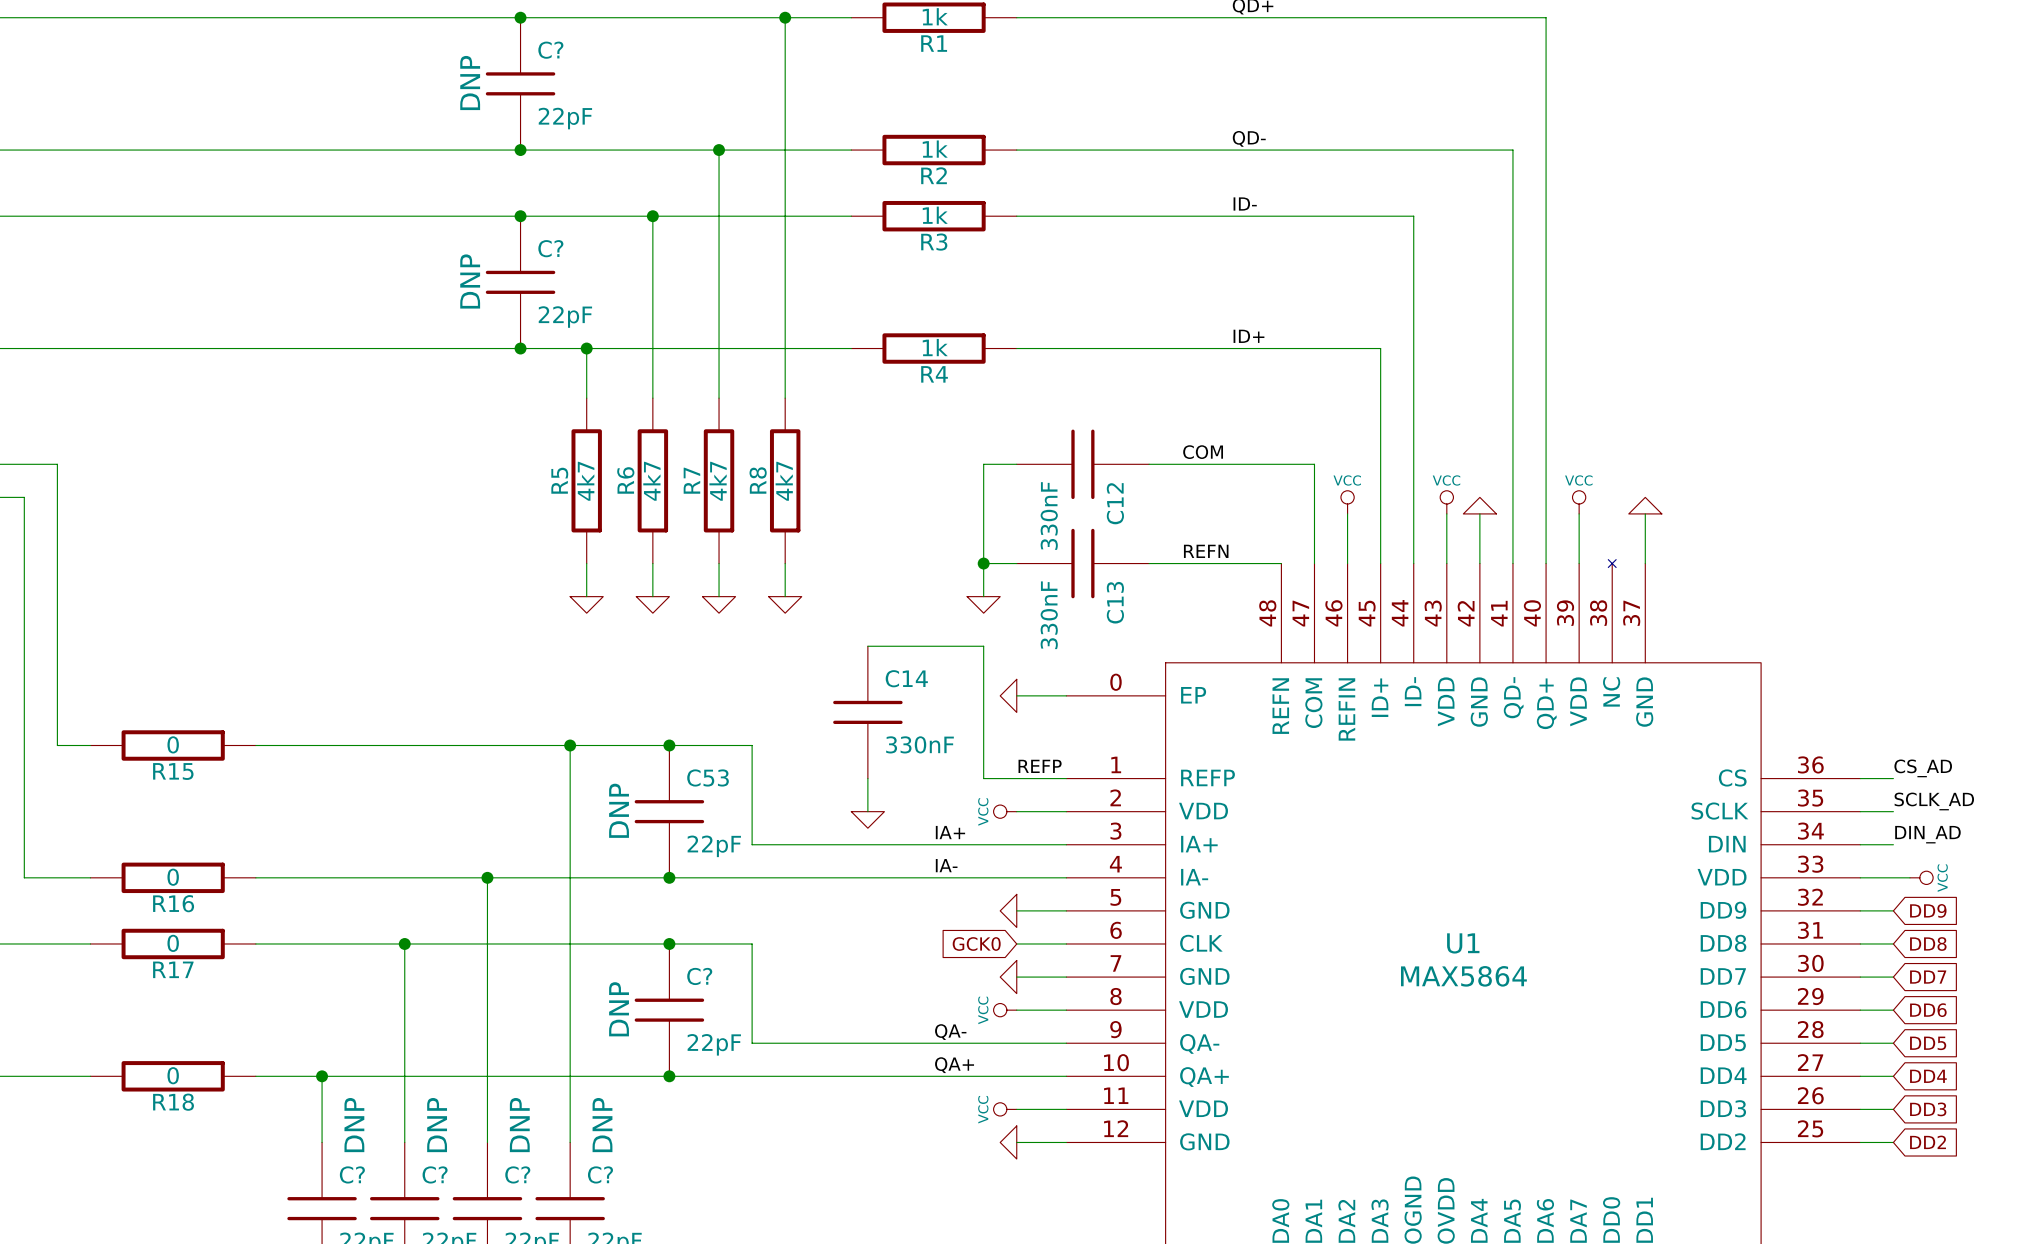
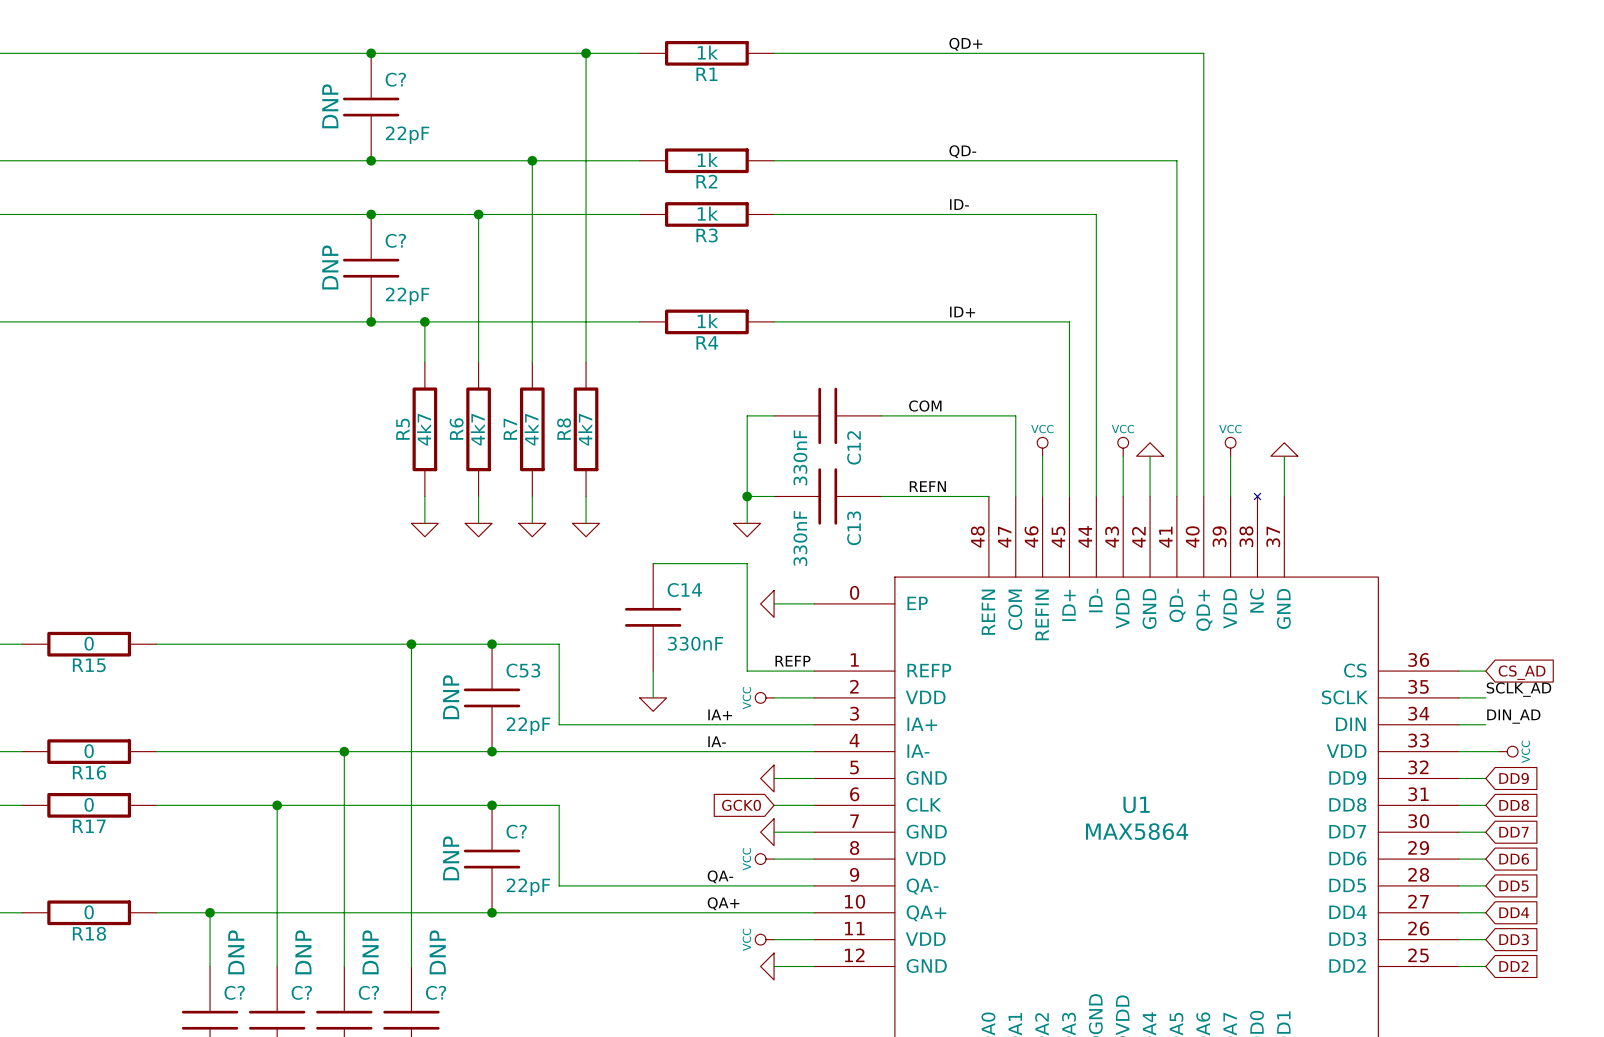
label: CS_AD (1923, 768) -> none
global label: none -> CS_AD (1522, 672)

